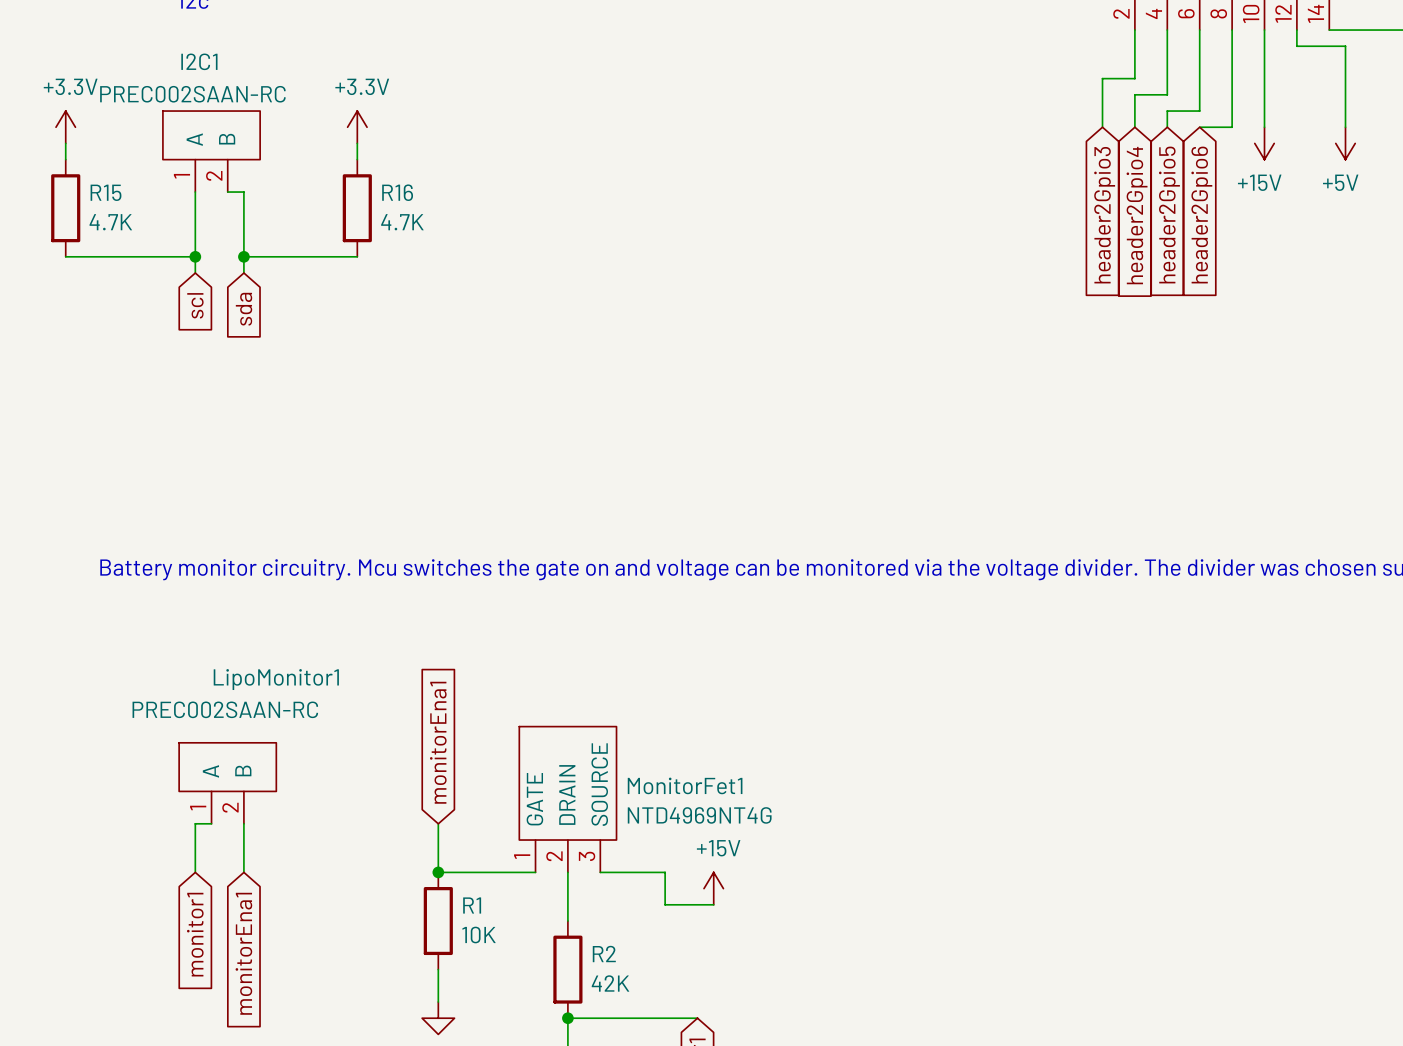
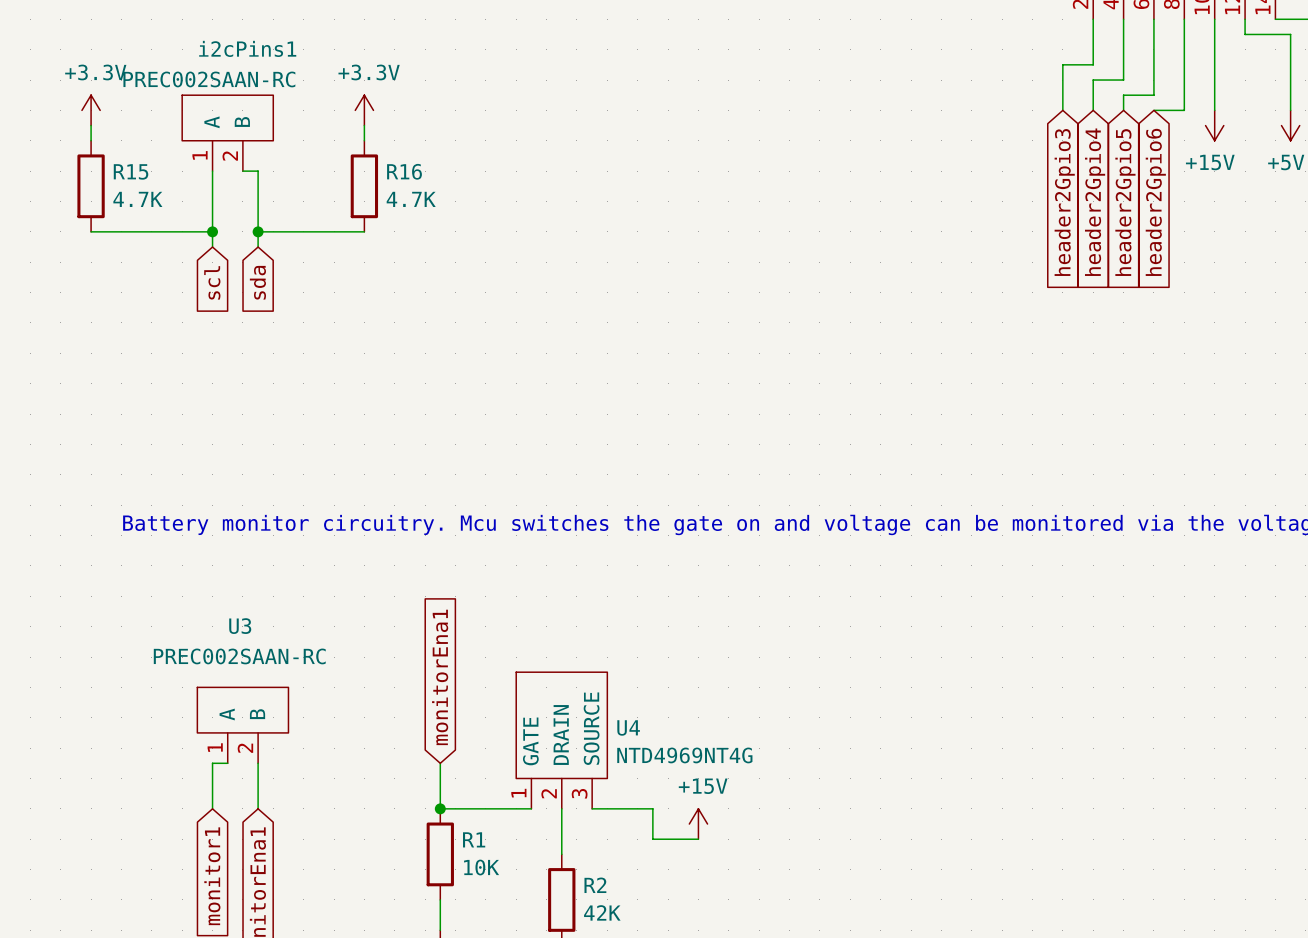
I2C1 name: I2C1 (199, 61) -> i2cPins1 (247, 48)
LipoMonitor1 name: LipoMonitor1 (276, 679) -> U3 (240, 626)
MonitorFet1 name: MonitorFet1 (685, 785) -> U4 (628, 727)

